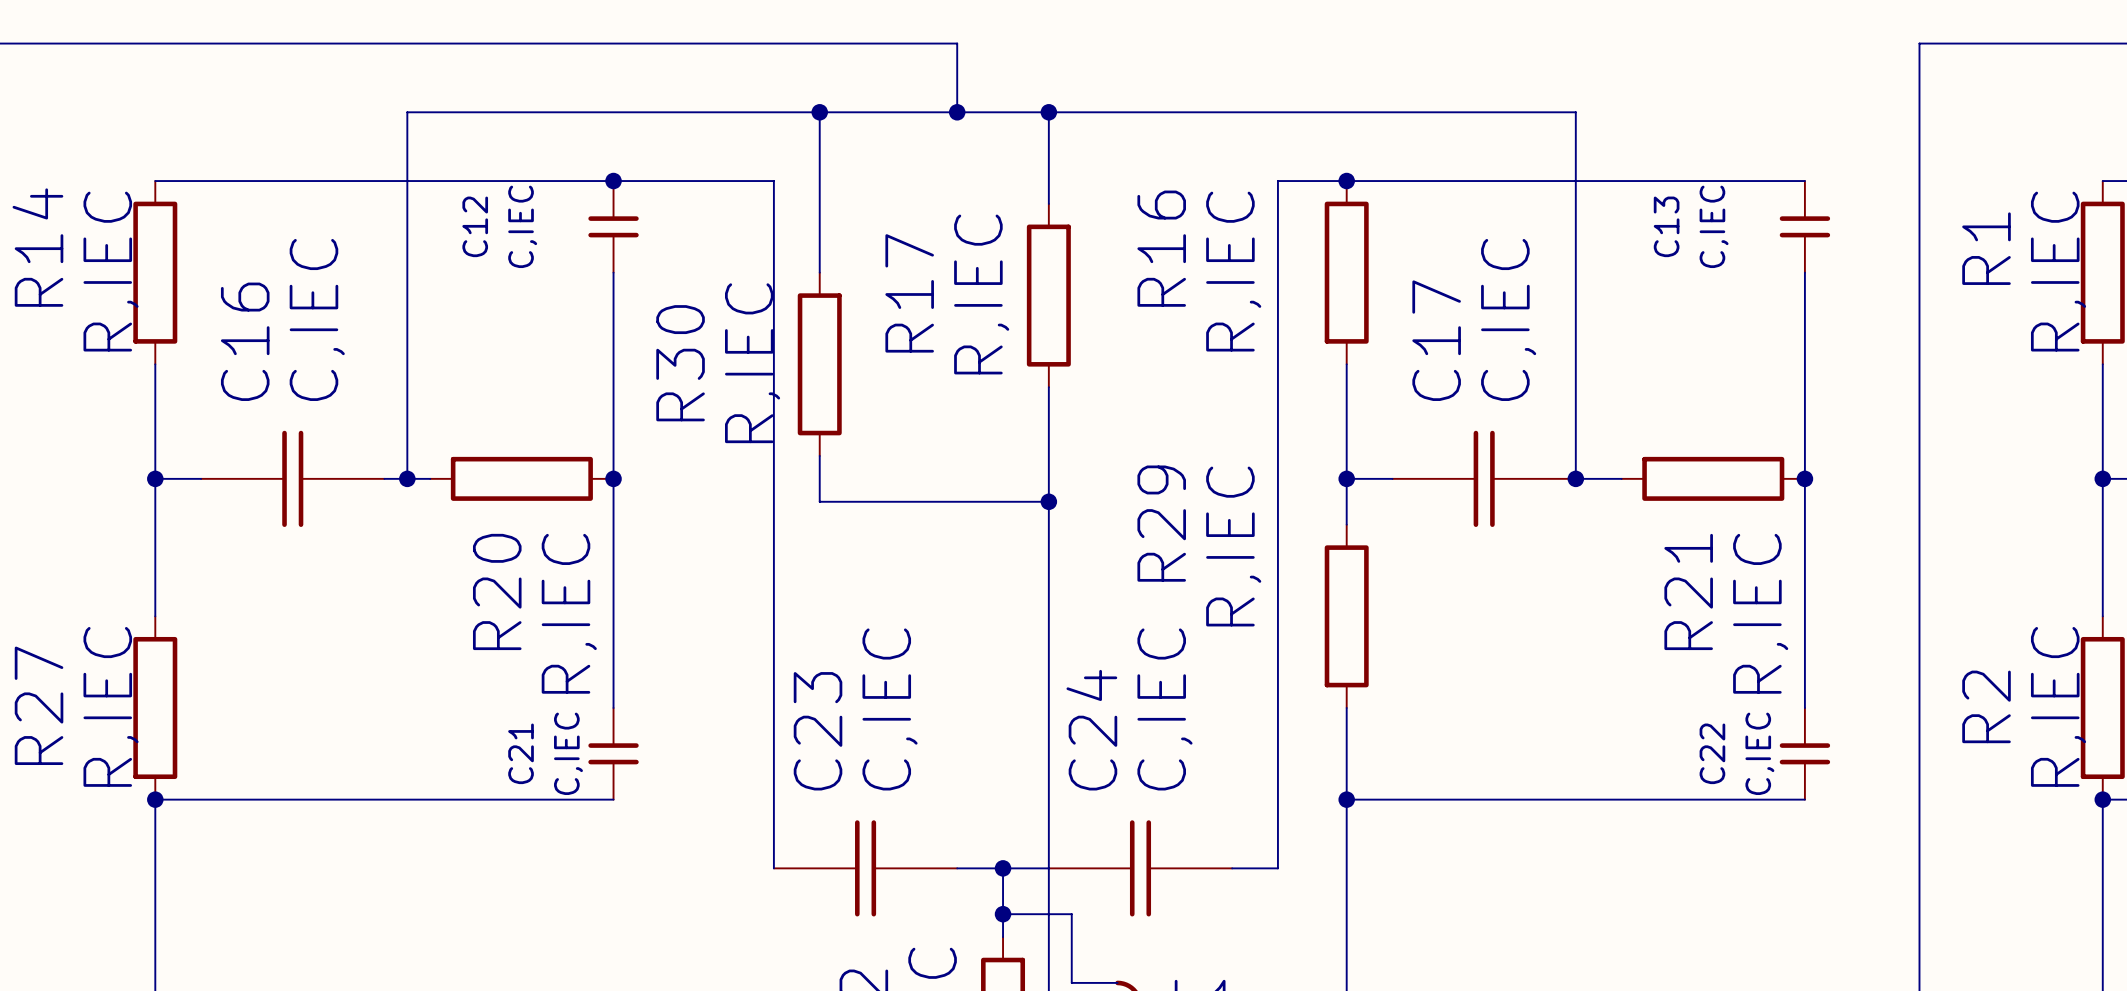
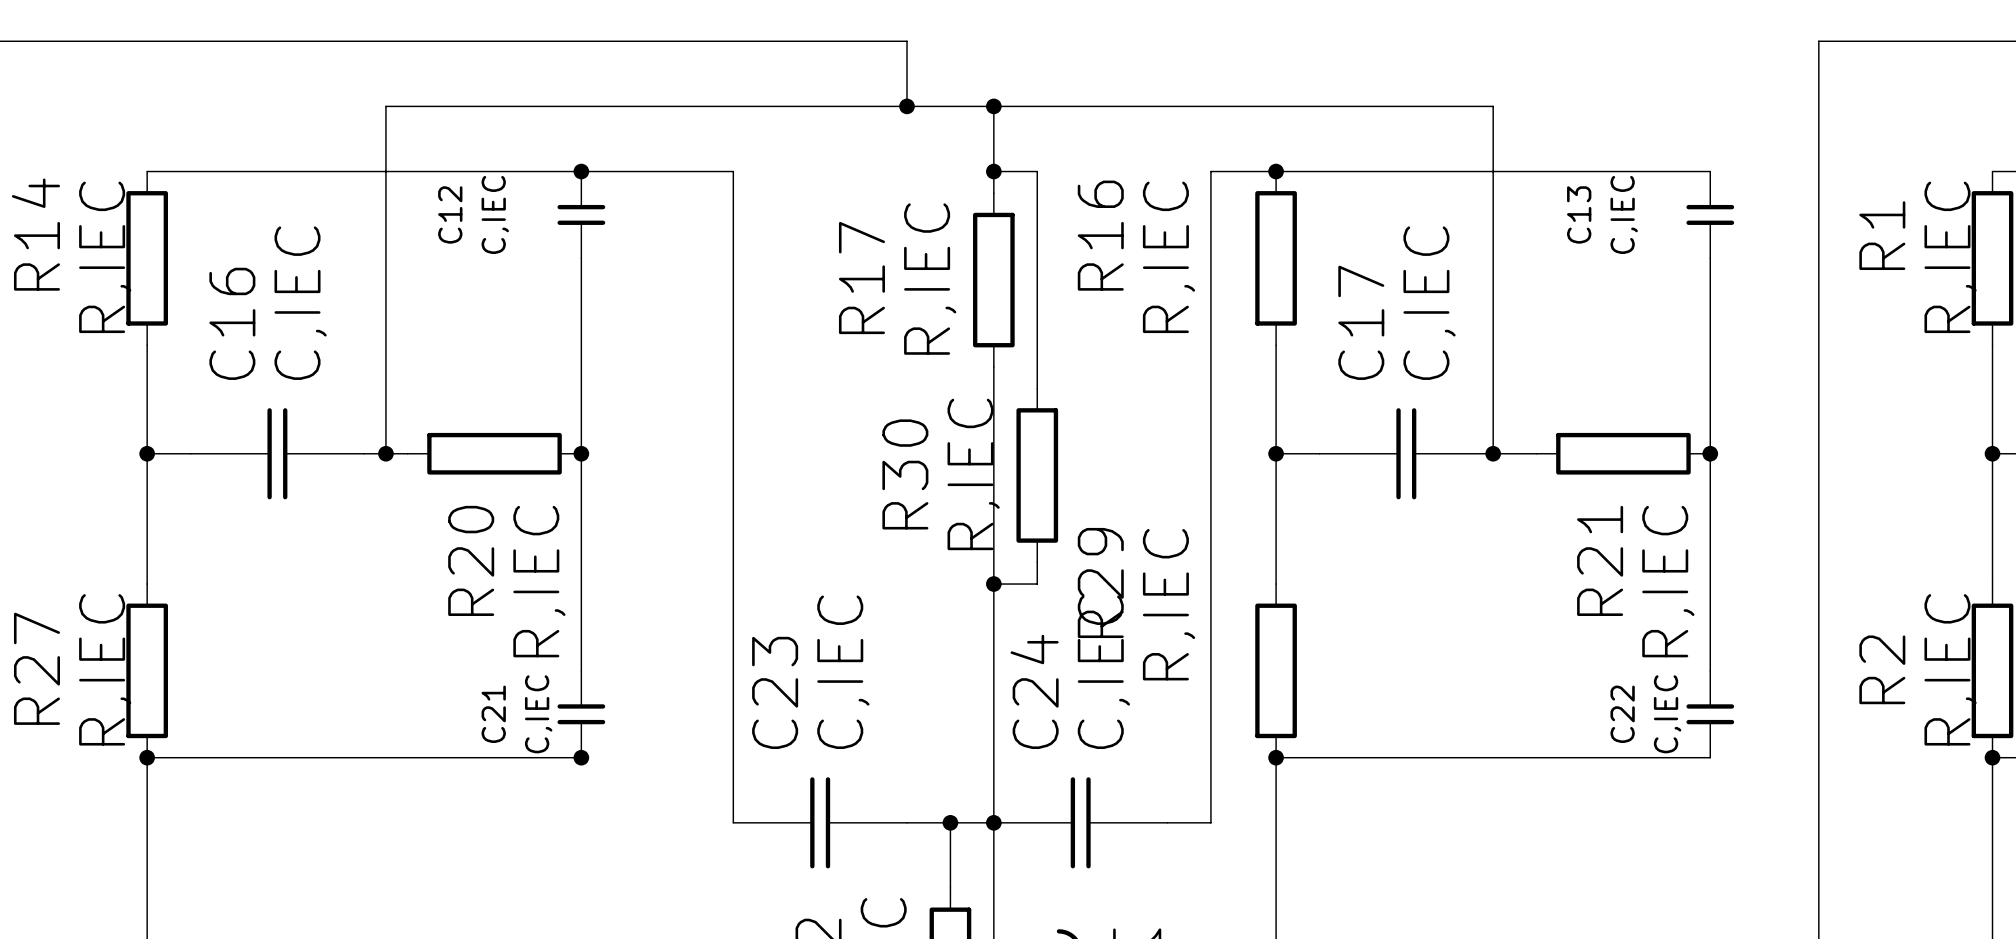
wire: (819, 112) (819, 272) -> none
junction: (819, 112) -> none
wire: none -> (993, 171) (1037, 171) (1037, 388)
junction: none -> (993, 171)
R30 position: (819, 364) -> (1037, 475)
wire: (819, 455) (819, 501) (1048, 501) -> none
junction: (1048, 501) -> none
wire: none -> (1037, 562) (1037, 584) (993, 584)
junction: none -> (993, 584)
R29 position: (1346, 616) -> (1276, 670)
wire: (1346, 707) (1346, 799) -> (1276, 497) (1276, 584)
junction: none -> (581, 757)
wire: (1003, 914) (1071, 914) (1071, 982) (1117, 982) -> none
junction position: (1003, 914) -> (993, 822)

